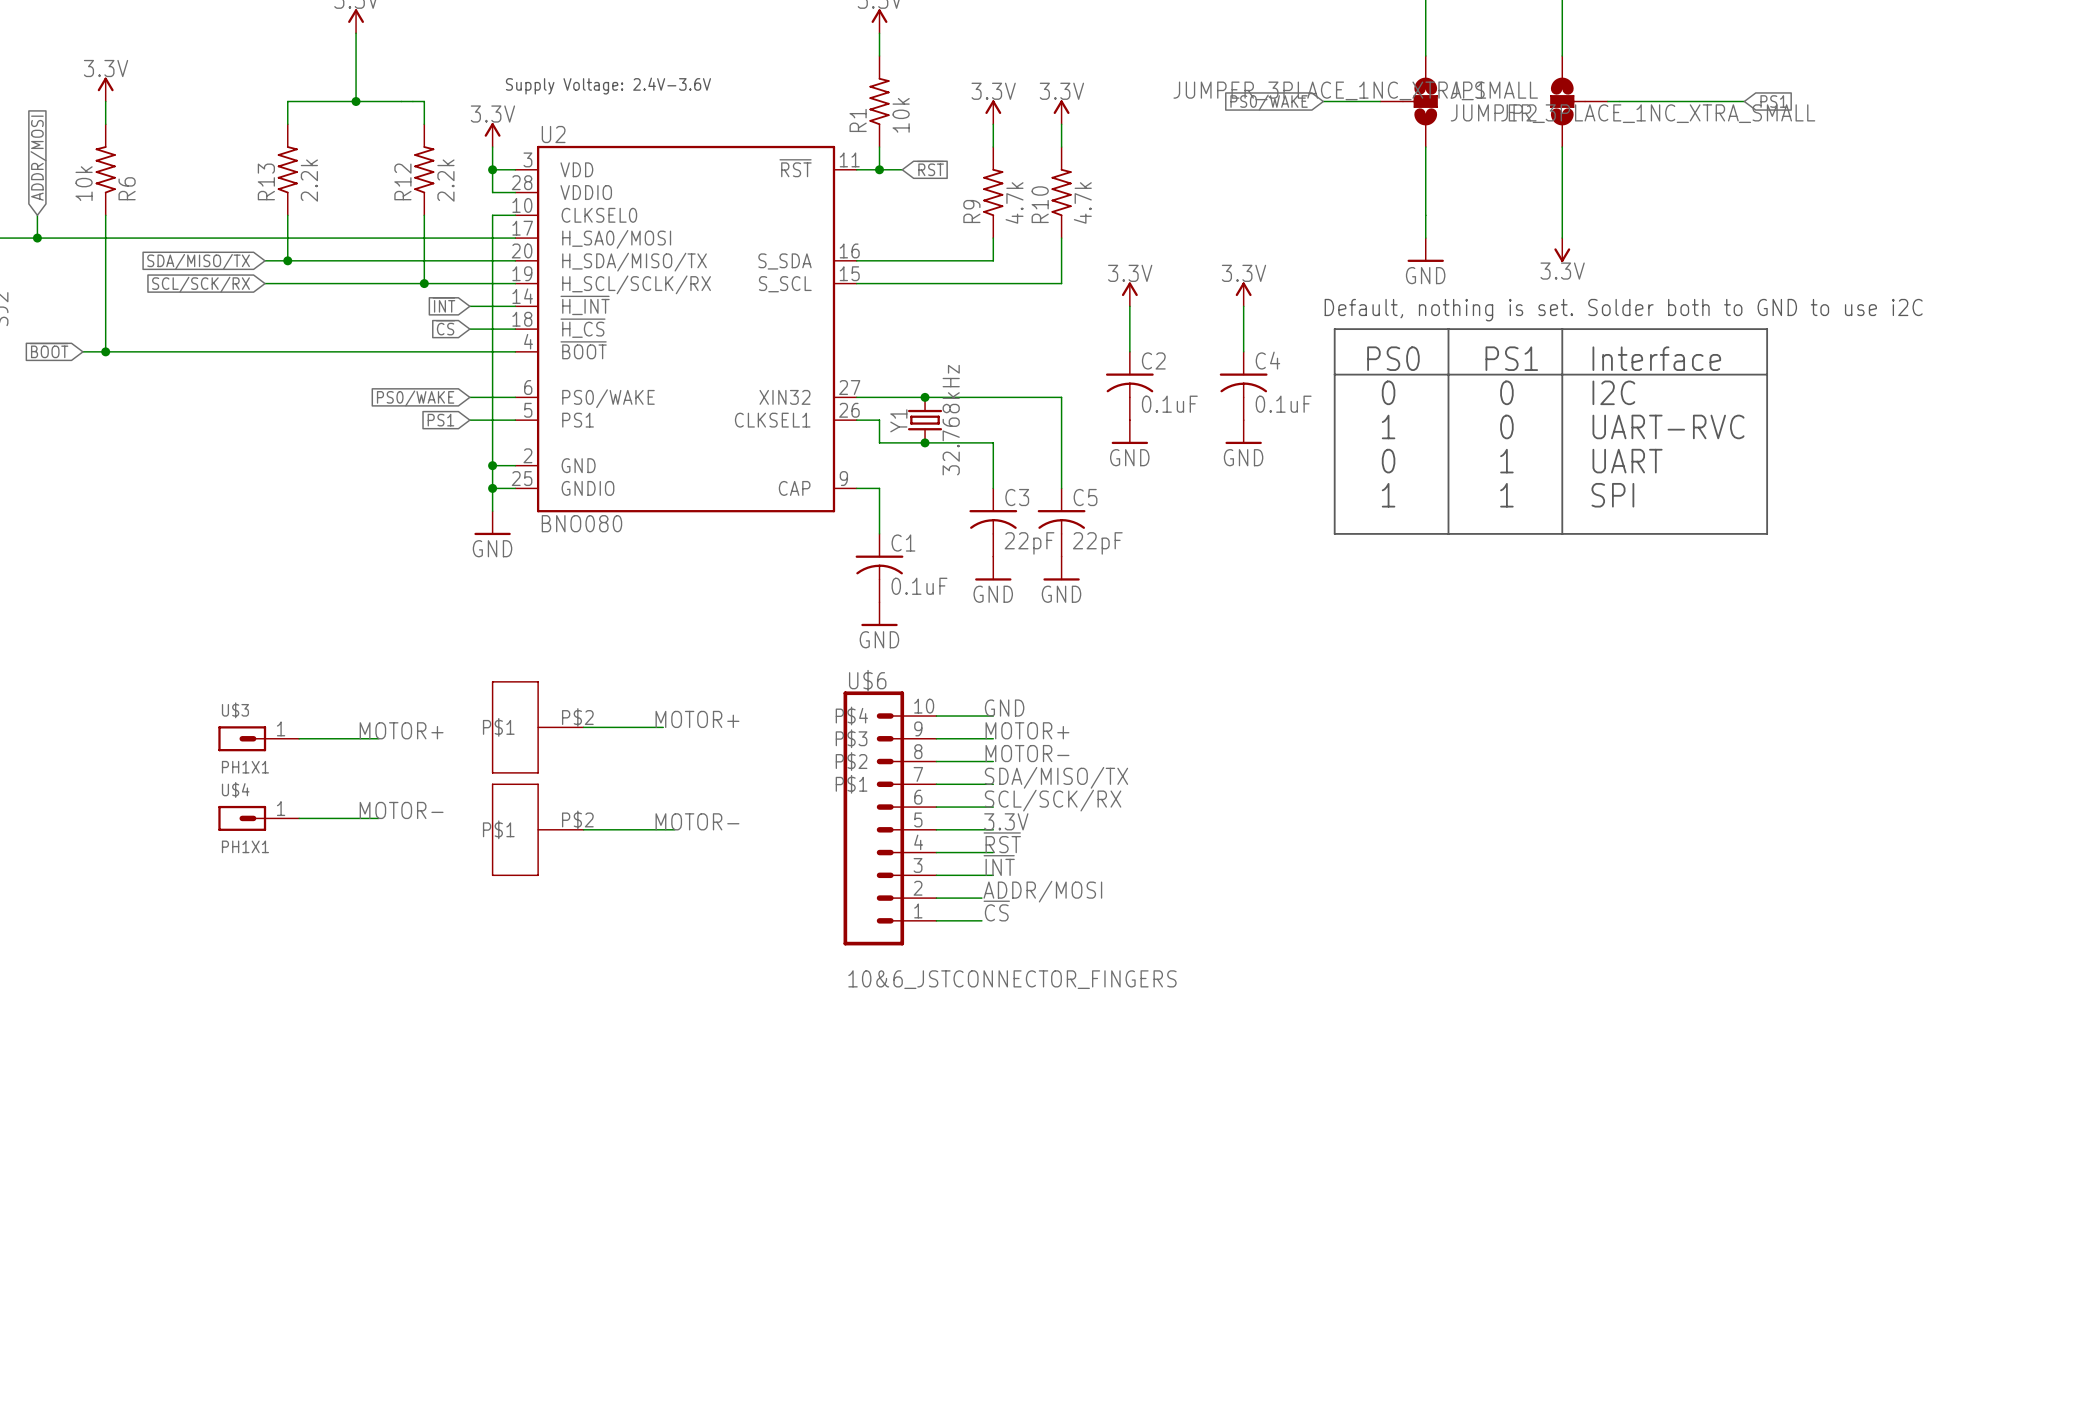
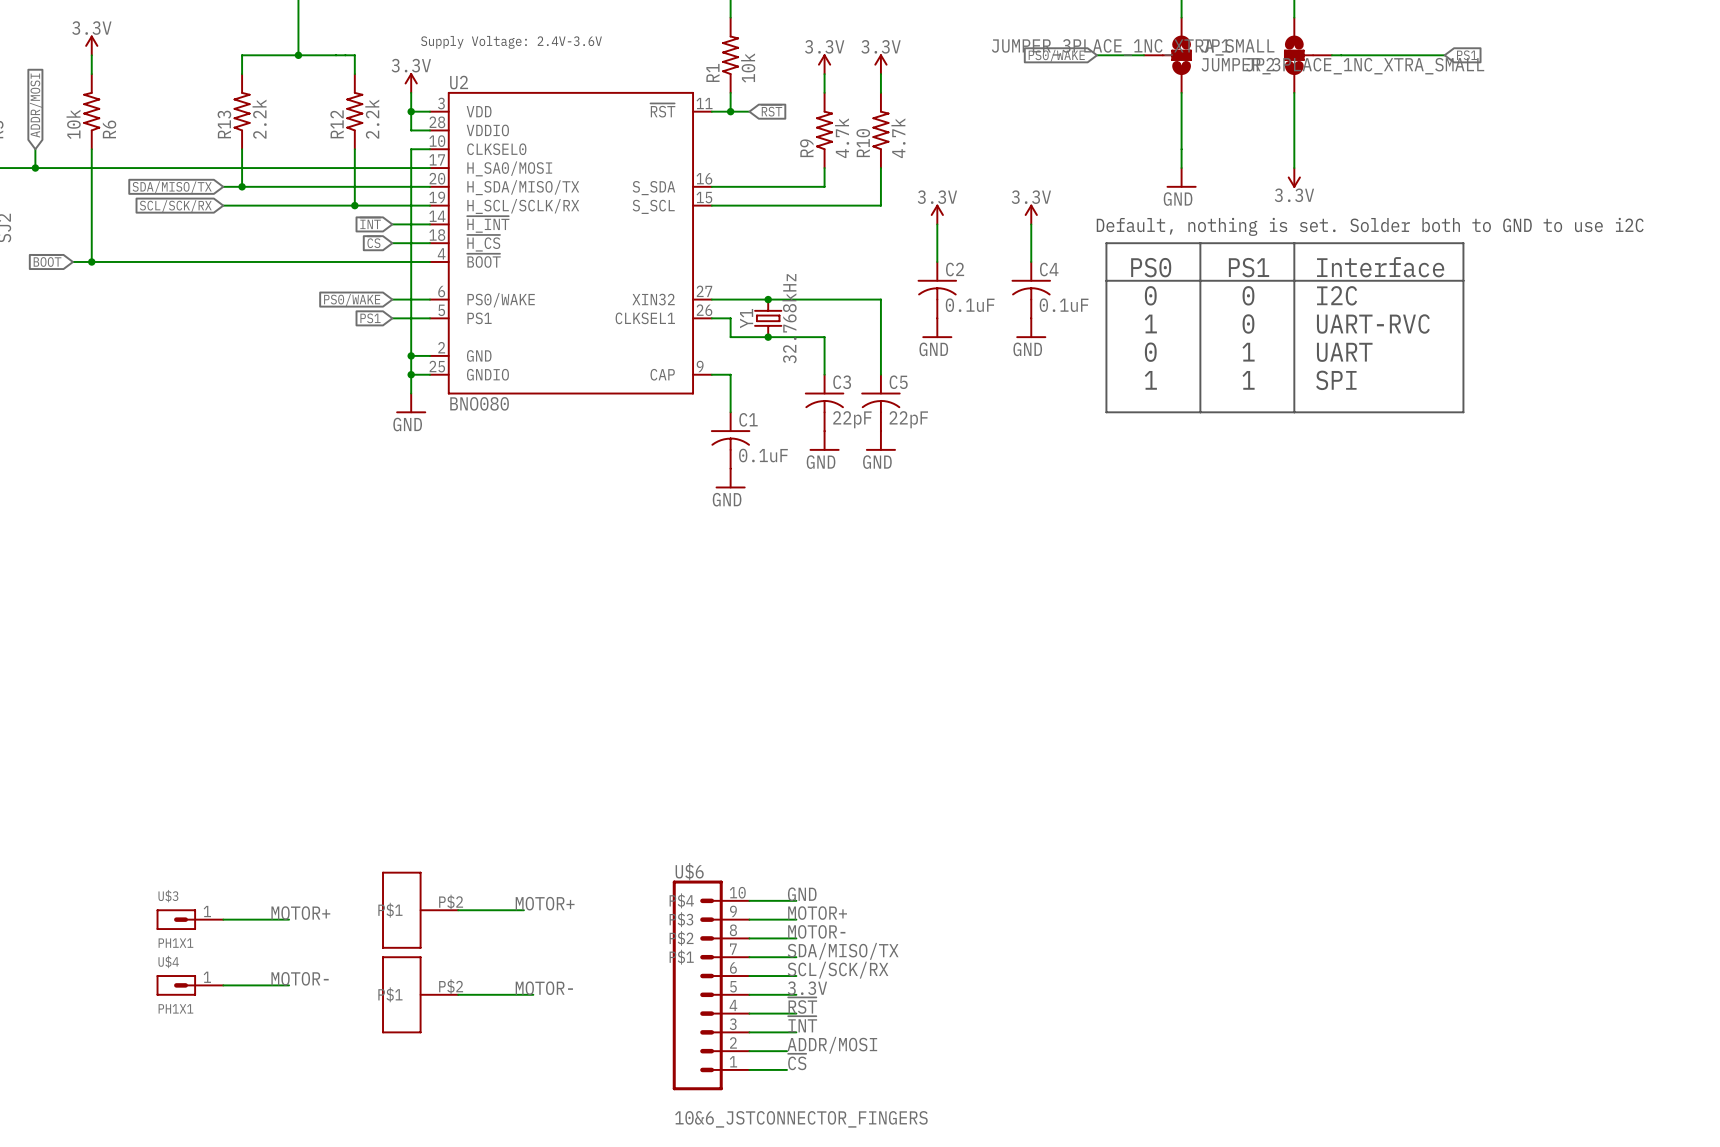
label: GND (1004, 708) -> none
wire: (936, 716) (993, 716) -> none
label: MOTOR+ (697, 719) -> none
part: (537, 727) -> none
wire: (583, 727) (663, 727) -> none
label: MOTOR+ (401, 730) -> none
label: MOTOR+ (1027, 730) -> none
U$3 position: (258, 738) -> (189, 919)
wire: (299, 738) (378, 738) -> none
wire: (936, 738) (993, 738) -> none
label: MOTOR- (1027, 753) -> none
wire: (936, 761) (993, 761) -> none
label: SDA/MISO/TX (1056, 777) -> none
wire: (936, 784) (993, 784) -> none
label: SCL/SCK/RX (1053, 800) -> none
wire: (936, 807) (993, 807) -> none
label: MOTOR- (401, 810) -> none
U$4 position: (258, 818) -> (189, 985)
wire: (299, 818) (378, 818) -> none
U$6 position: (889, 818) -> (711, 985)
label: MOTOR- (697, 821) -> none
label: 3.3V (1006, 821) -> none
part: (537, 829) -> none
wire: (583, 829) (674, 829) -> none
wire: (936, 829) (993, 829) -> none
label: ~{RST} (1002, 842) -> none
wire: (936, 852) (993, 852) -> none
label: ~{INT} (999, 865) -> none
wire: (936, 875) (993, 875) -> none
label: ADDR/MOSI (1042, 891) -> none
wire: (936, 898) (981, 898) -> none
label: ~{CS} (996, 911) -> none
wire: (936, 920) (981, 920) -> none
label: none -> GND (802, 894)
wire: none -> (749, 900) (796, 900)
label: none -> MOTOR+ (545, 903)
part: none -> (420, 910)
wire: none -> (458, 910) (523, 910)
label: none -> MOTOR+ (300, 913)
label: none -> MOTOR+ (817, 913)
wire: none -> (223, 919) (289, 919)
wire: none -> (749, 919) (796, 919)
label: none -> MOTOR- (816, 931)
wire: none -> (749, 938) (796, 938)
label: none -> SDA/MISO/TX (843, 951)
wire: none -> (749, 957) (796, 957)
label: none -> SCL/SCK/RX (838, 970)
wire: none -> (749, 976) (796, 976)
label: none -> MOTOR- (300, 978)
wire: none -> (223, 985) (289, 985)
label: none -> MOTOR- (544, 988)
label: none -> 3.3V (807, 988)
part: none -> (420, 994)
wire: none -> (458, 994) (533, 994)
wire: none -> (749, 994) (796, 994)
label: none -> ~{RST} (802, 1005)
wire: none -> (749, 1013) (796, 1013)
label: none -> ~{INT} (802, 1024)
wire: none -> (749, 1032) (796, 1032)
label: none -> ADDR/MOSI (832, 1045)
wire: none -> (749, 1051) (786, 1051)
label: none -> ~{CS} (797, 1061)
wire: none -> (749, 1069) (786, 1069)

